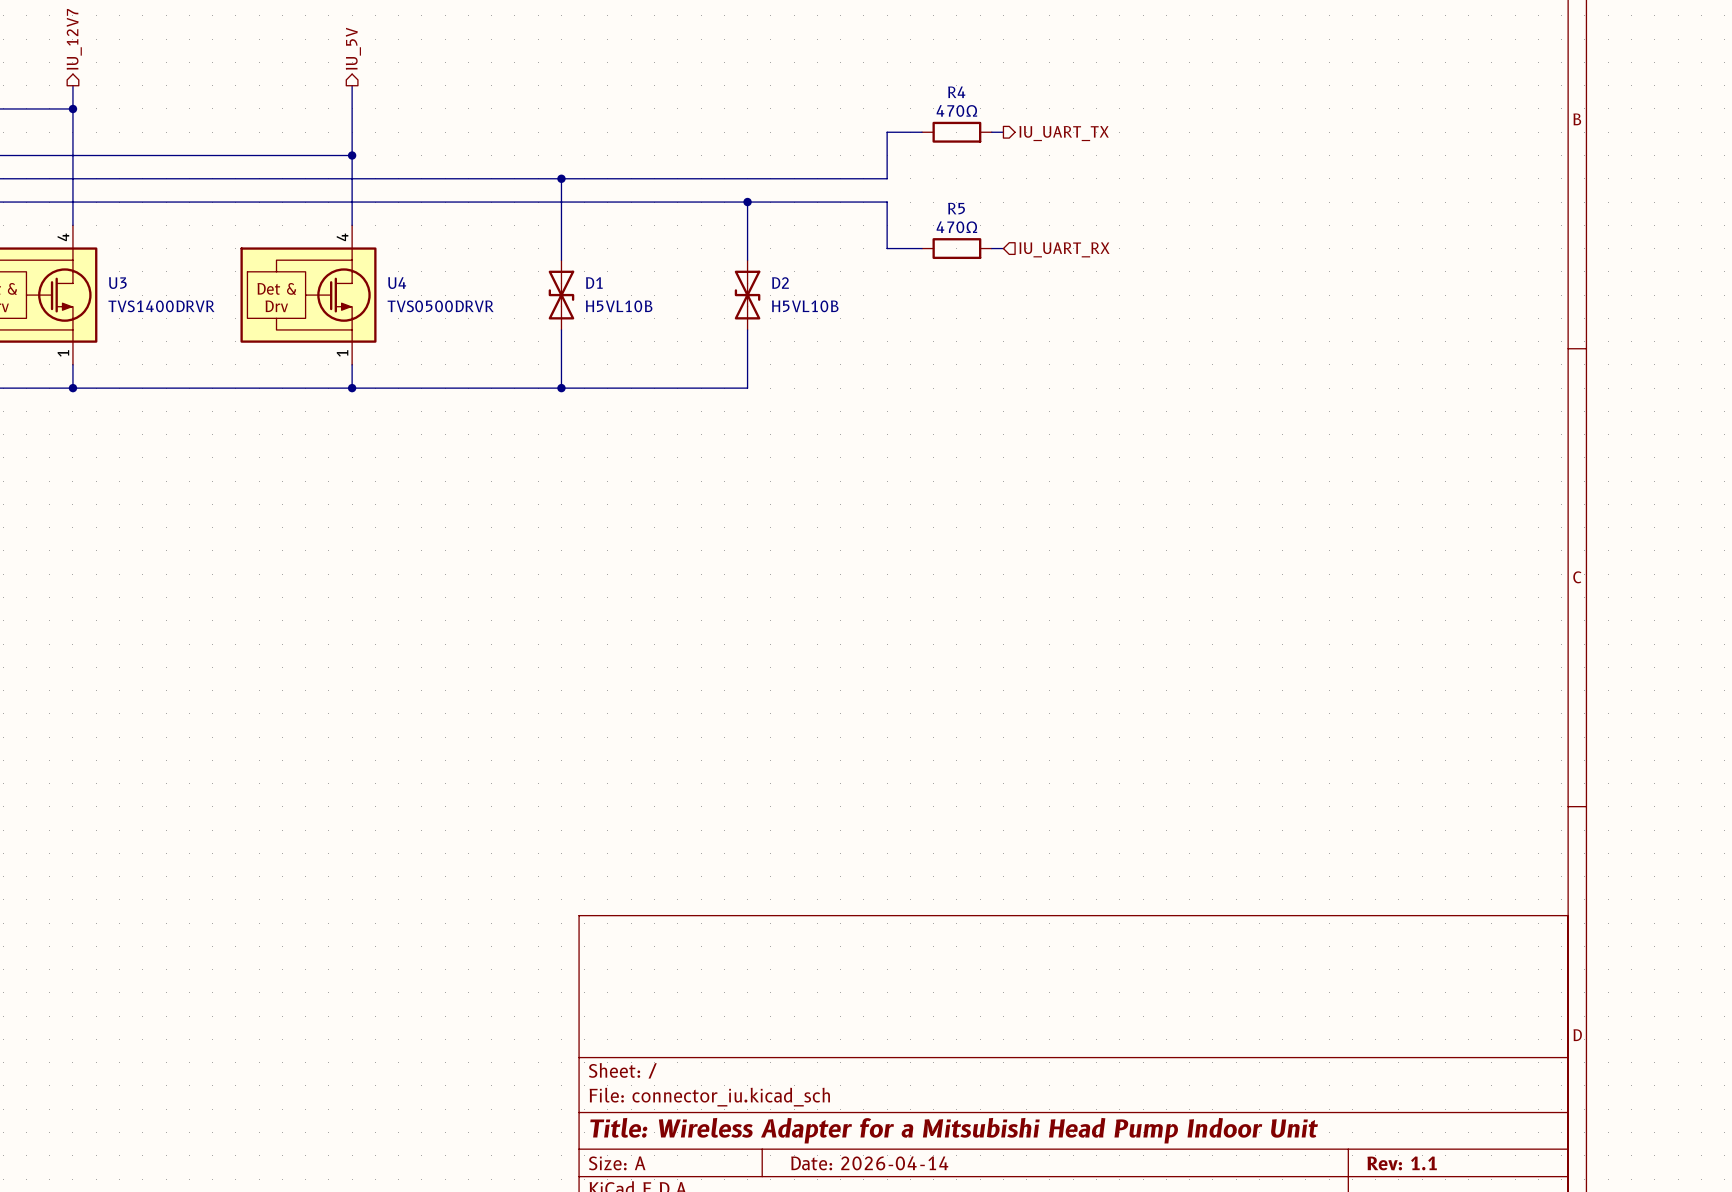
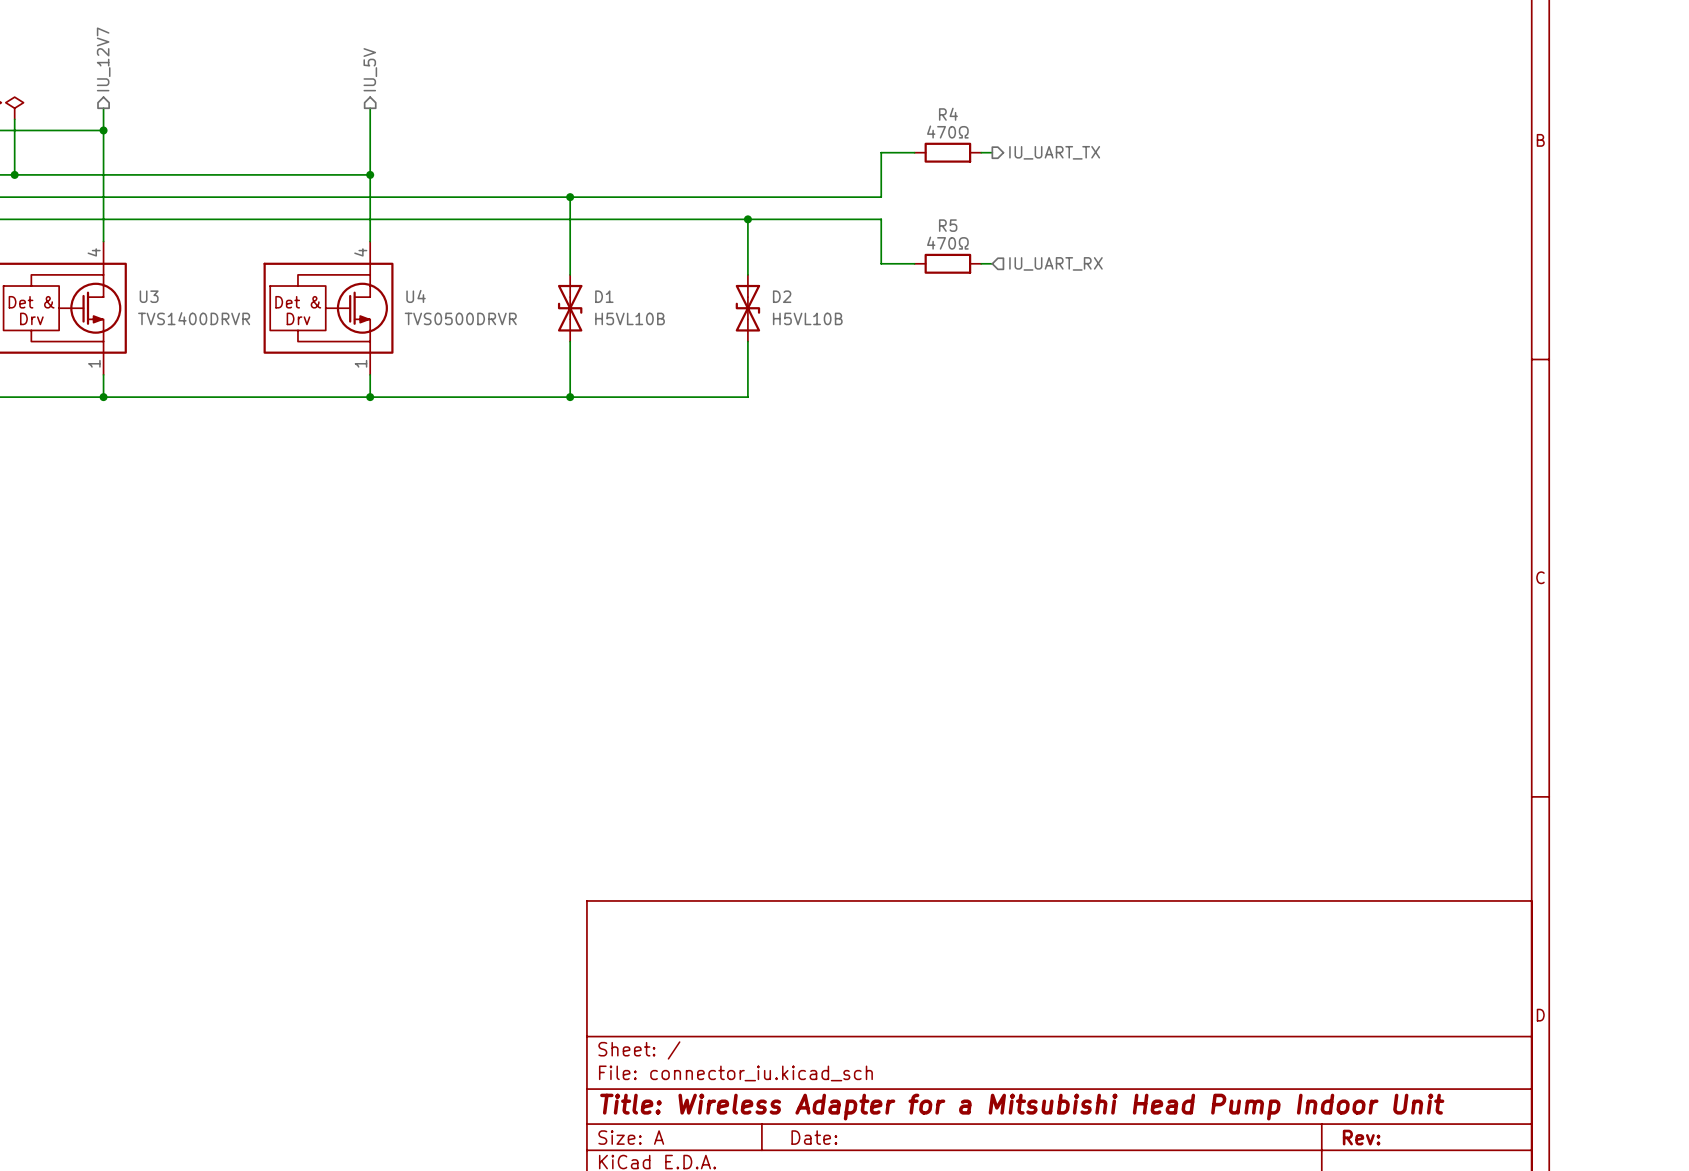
title block: Date: 2026-04-14 (869, 1163) -> Date: (814, 1137)
title block: Rev: 1.1 (1402, 1163) -> Rev: (1361, 1137)

